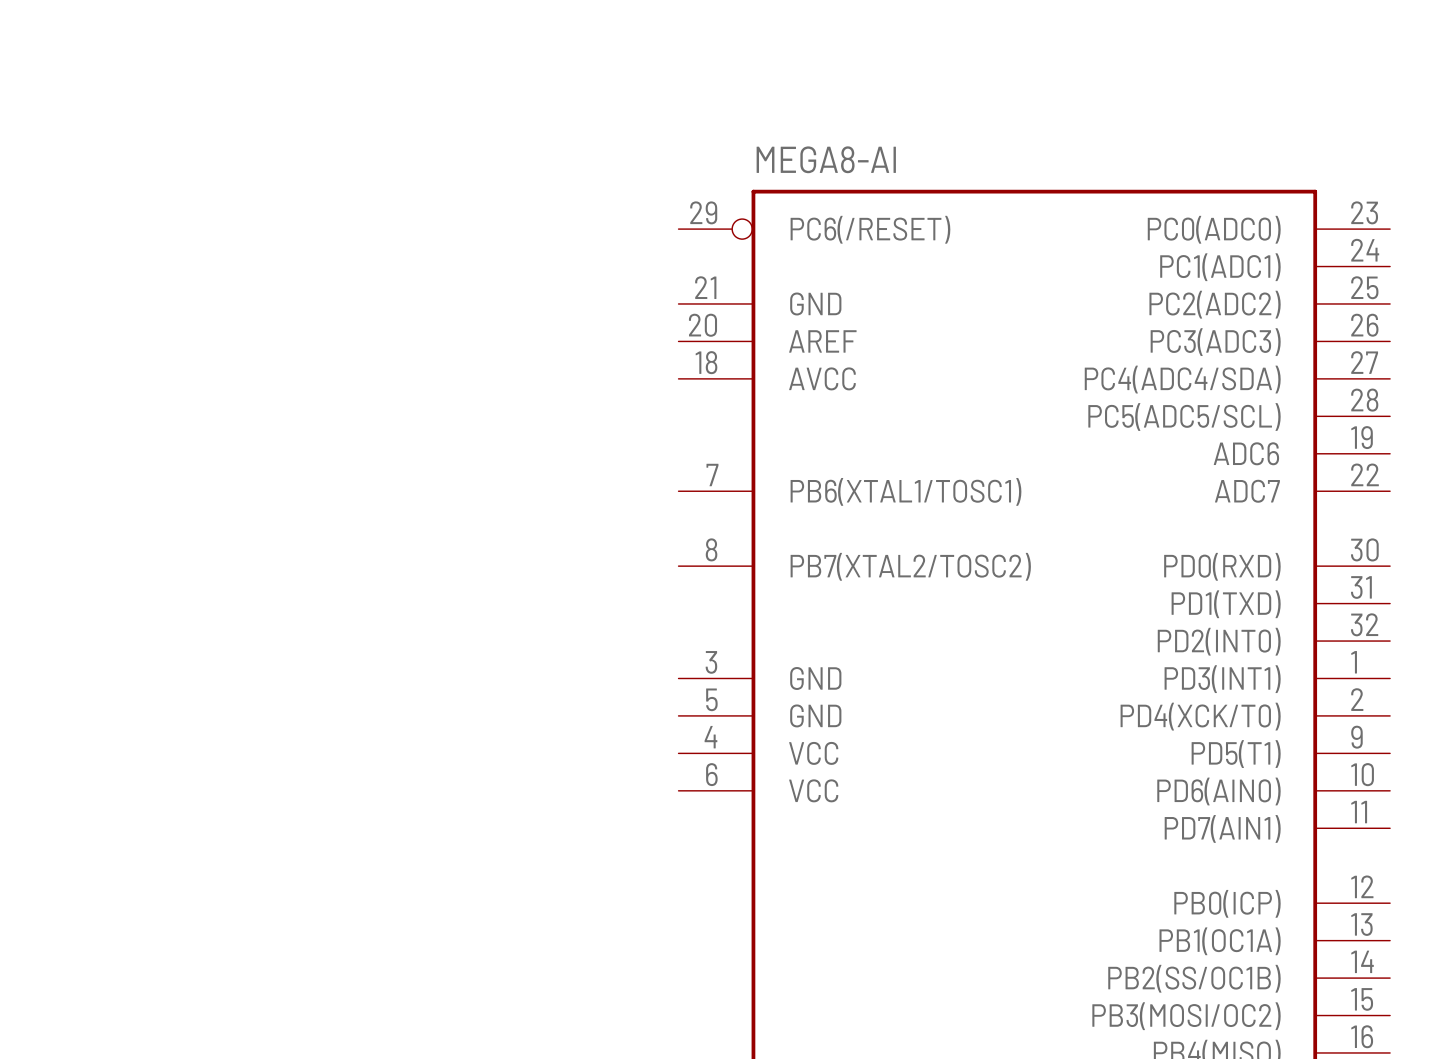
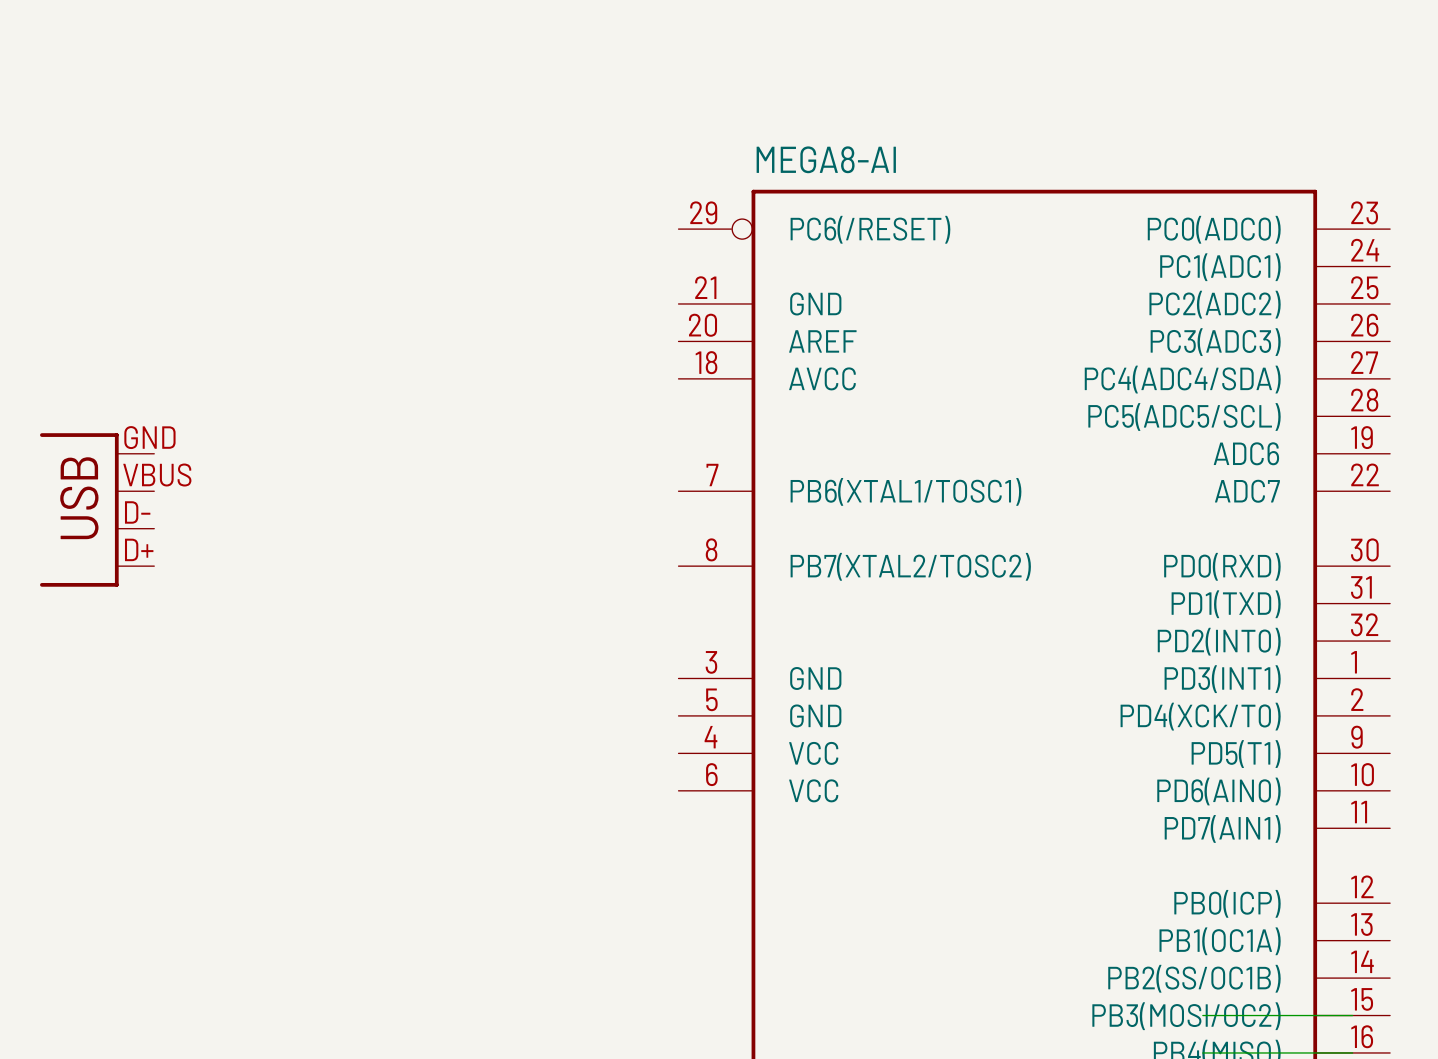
part: none -> (97, 509)
wire: none -> (1202, 1015) (1352, 1015)
wire: none -> (1202, 1052) (1352, 1052)

